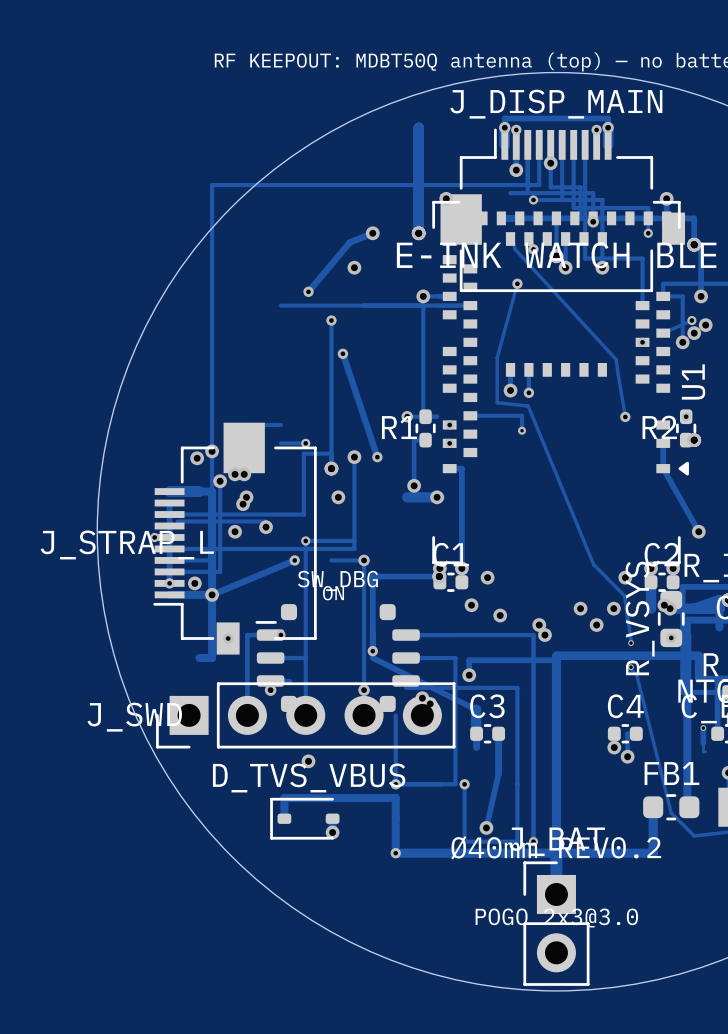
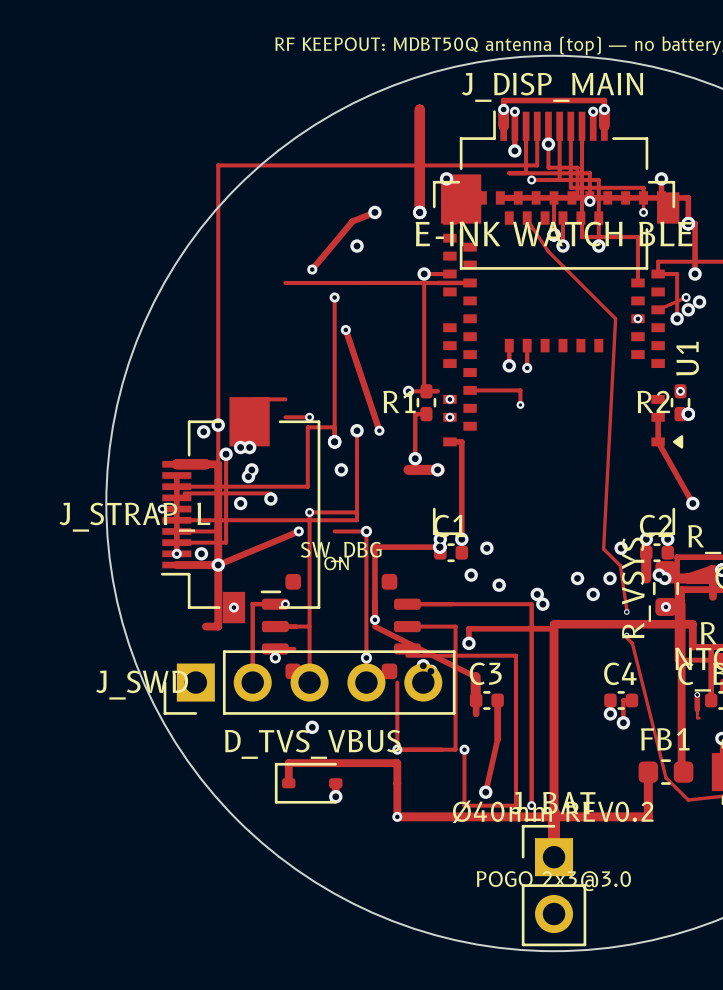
track: (512, 240) (515, 249) (616, 359) (625, 416) -> none
via: (533, 249) -> none
track: (517, 283) (497, 357) (497, 402) (528, 406) (593, 564) (607, 578) -> (527, 218) (548, 251) (615, 318) (603, 549)
via: (517, 283) -> none
via: (625, 416) -> none

